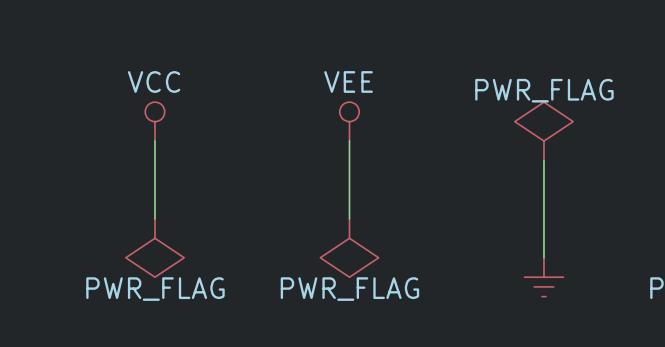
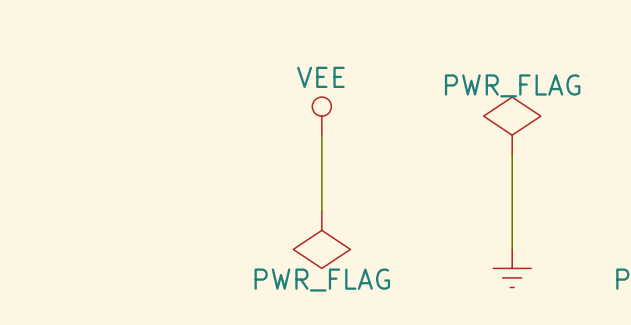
power symbol: VCC (155, 121) -> none
wire: (155, 141) (155, 218) -> none
power symbol: PWR_FLAG (155, 248) -> none

